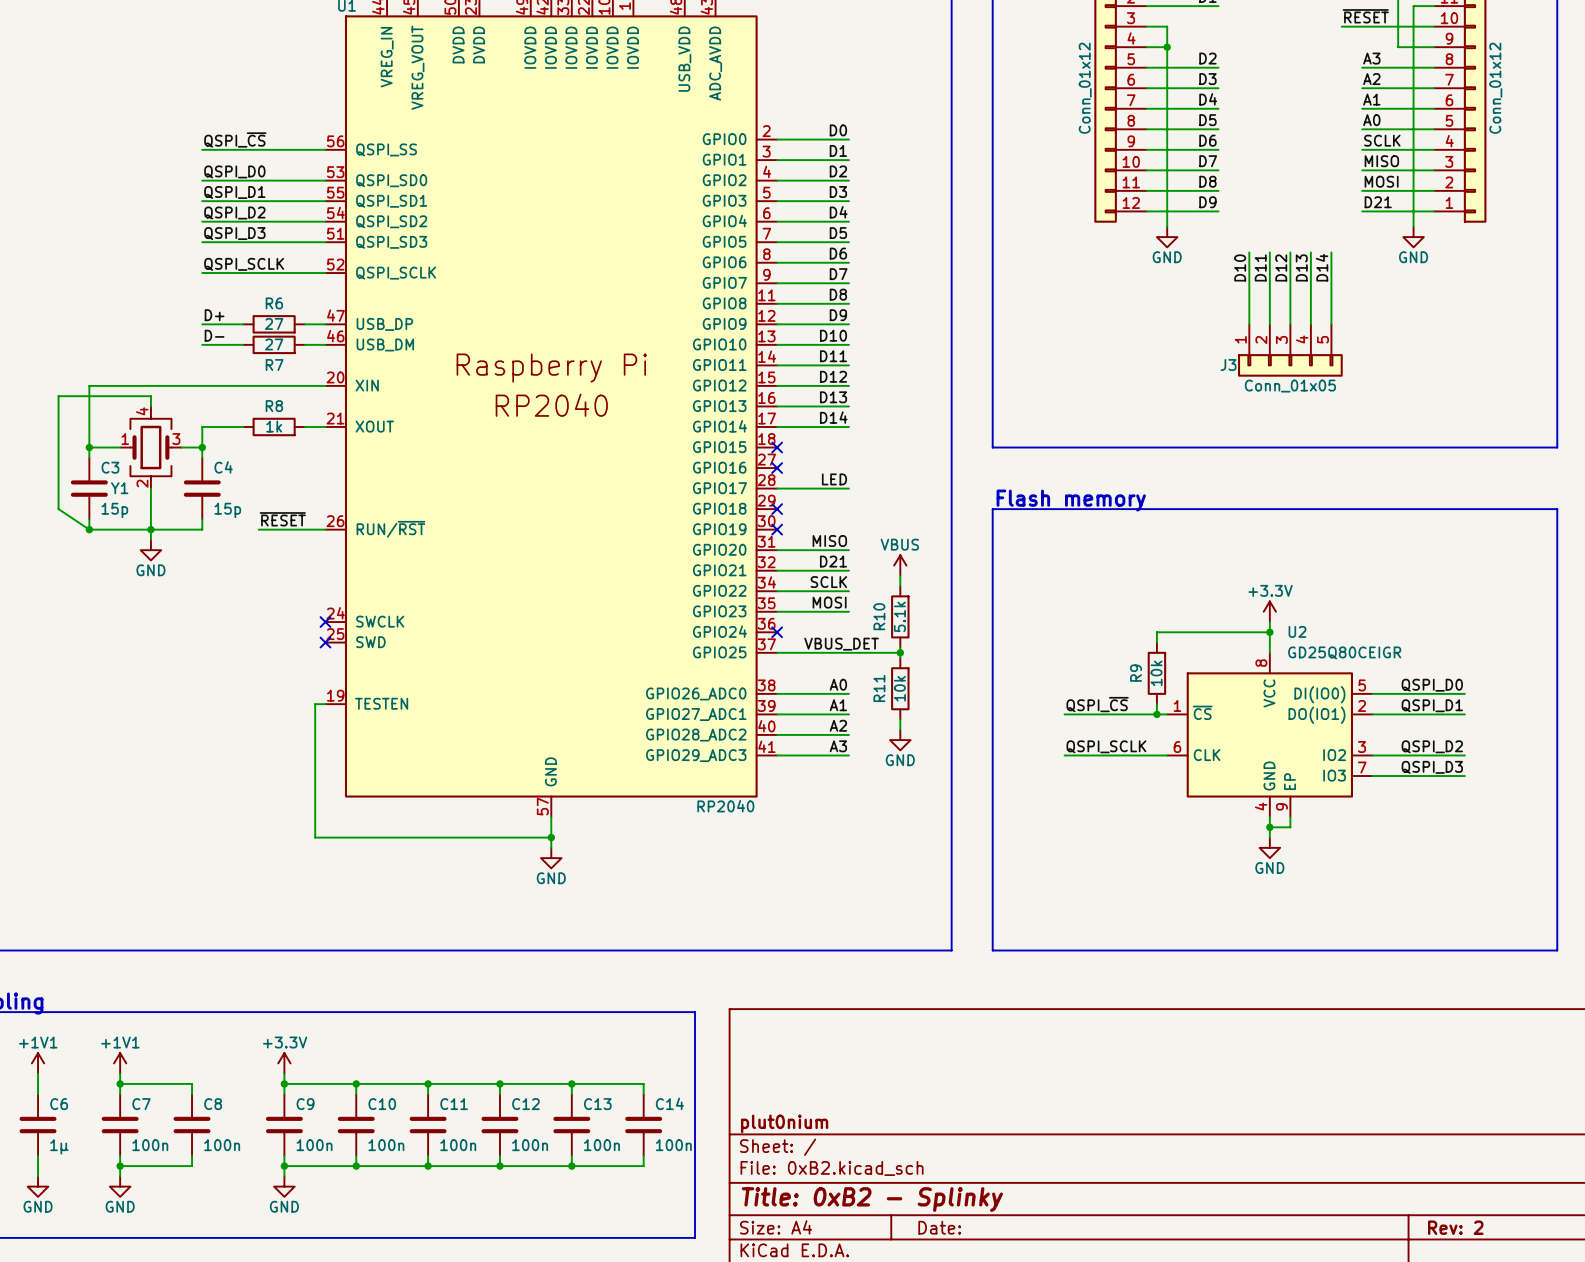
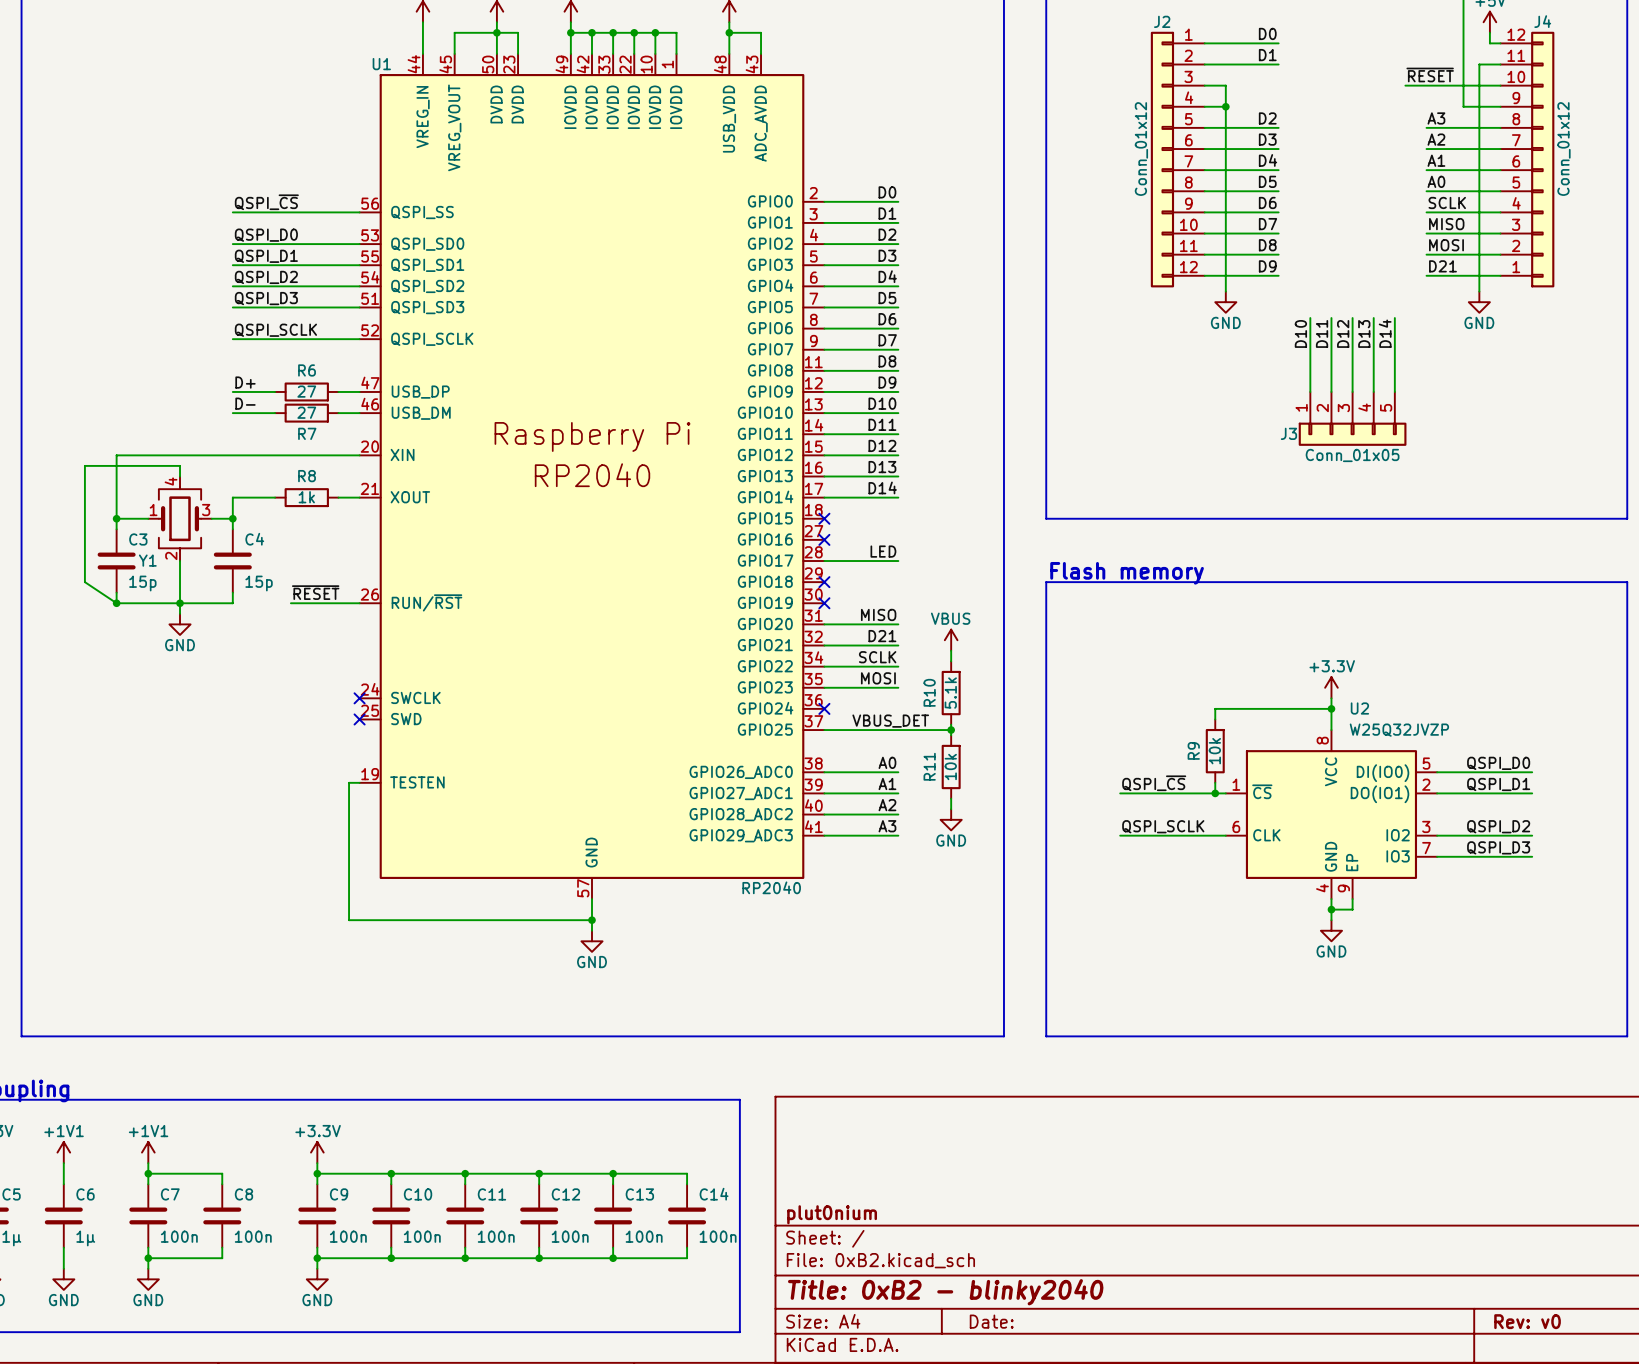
U2 value: GD25Q80CEIGR (1344, 652) -> W25Q32JVZP (1399, 730)
title block: Title: 0xB2 - Splinky (872, 1199) -> Title: 0xB2 - blinky2040 (945, 1292)
title block: Rev: 2 (1455, 1227) -> Rev: v0 (1527, 1321)

